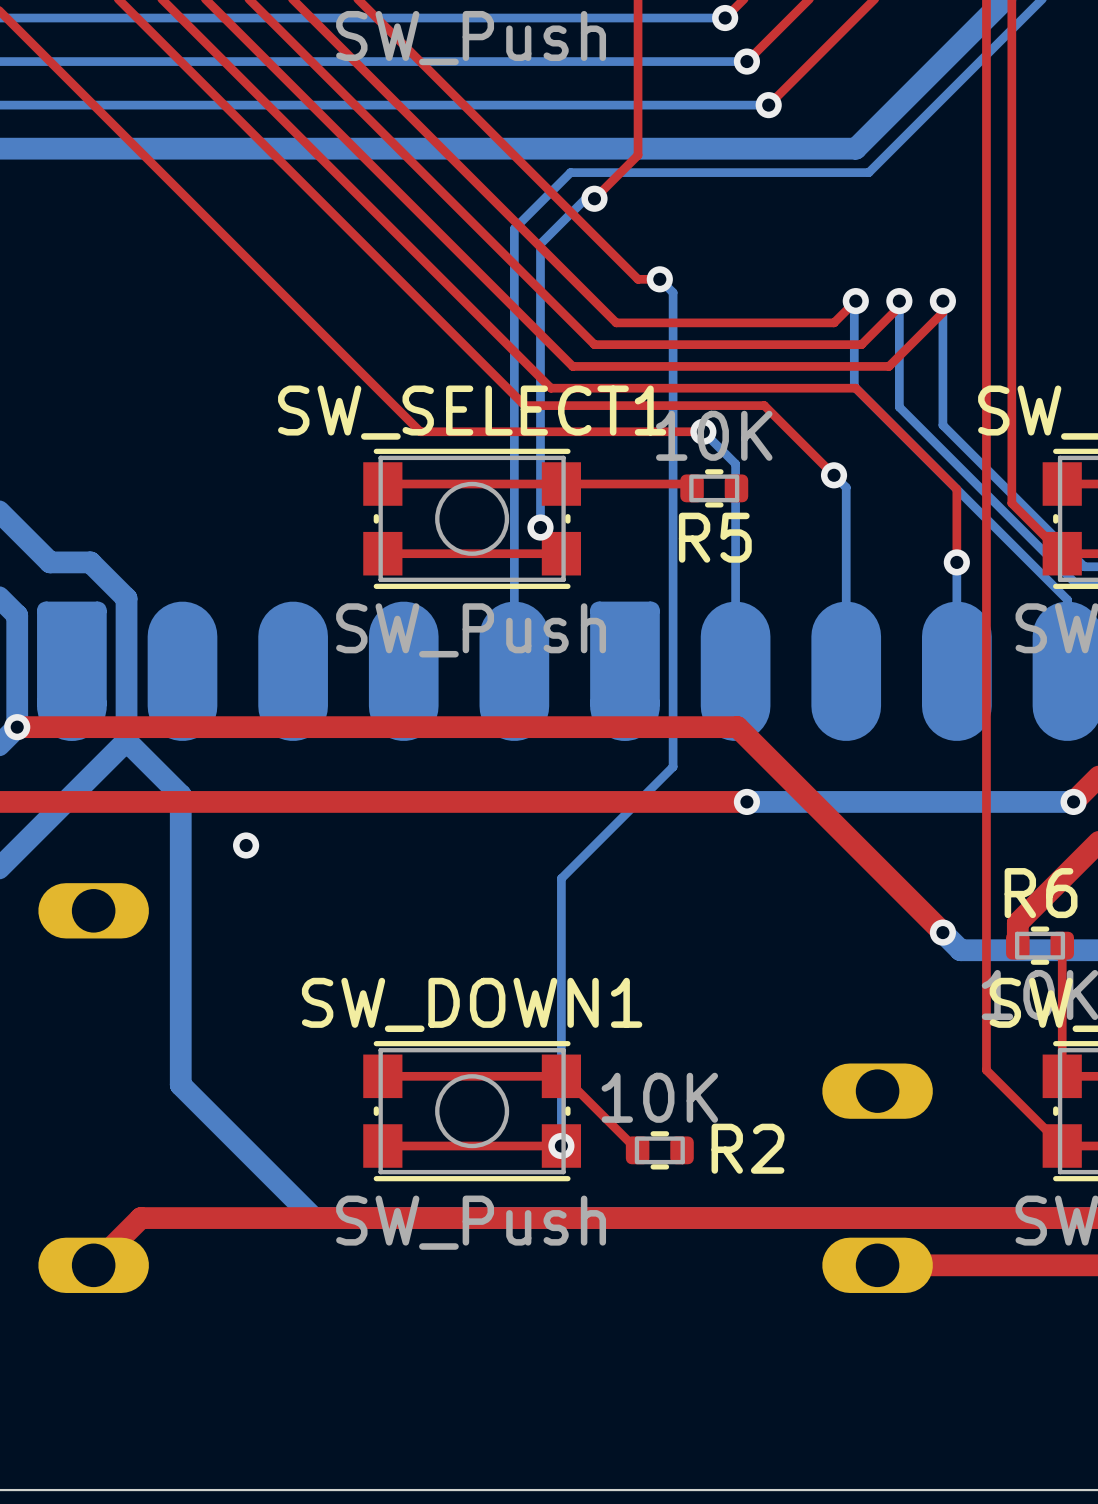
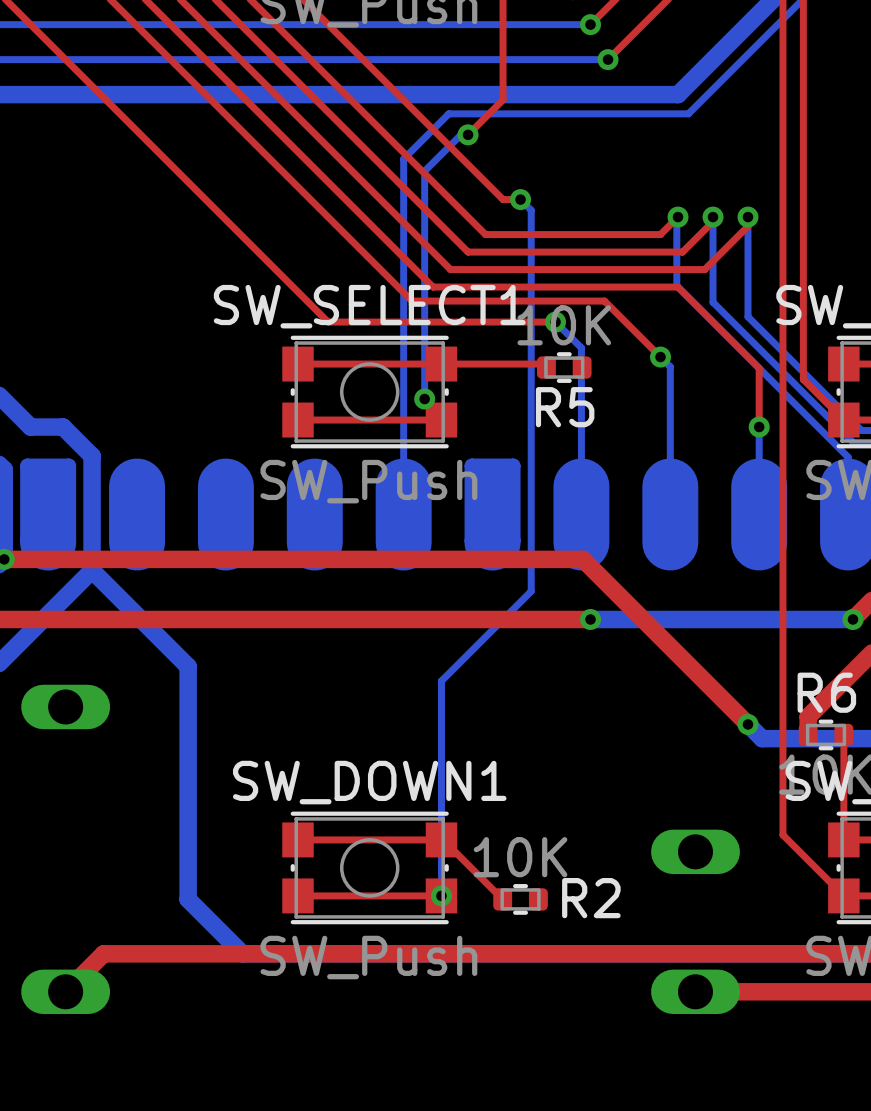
bottom track: (180, 795) (180, 1085) (246, 1150) -> (135, 614) (188, 666) (188, 899)
via: (246, 845) -> none

